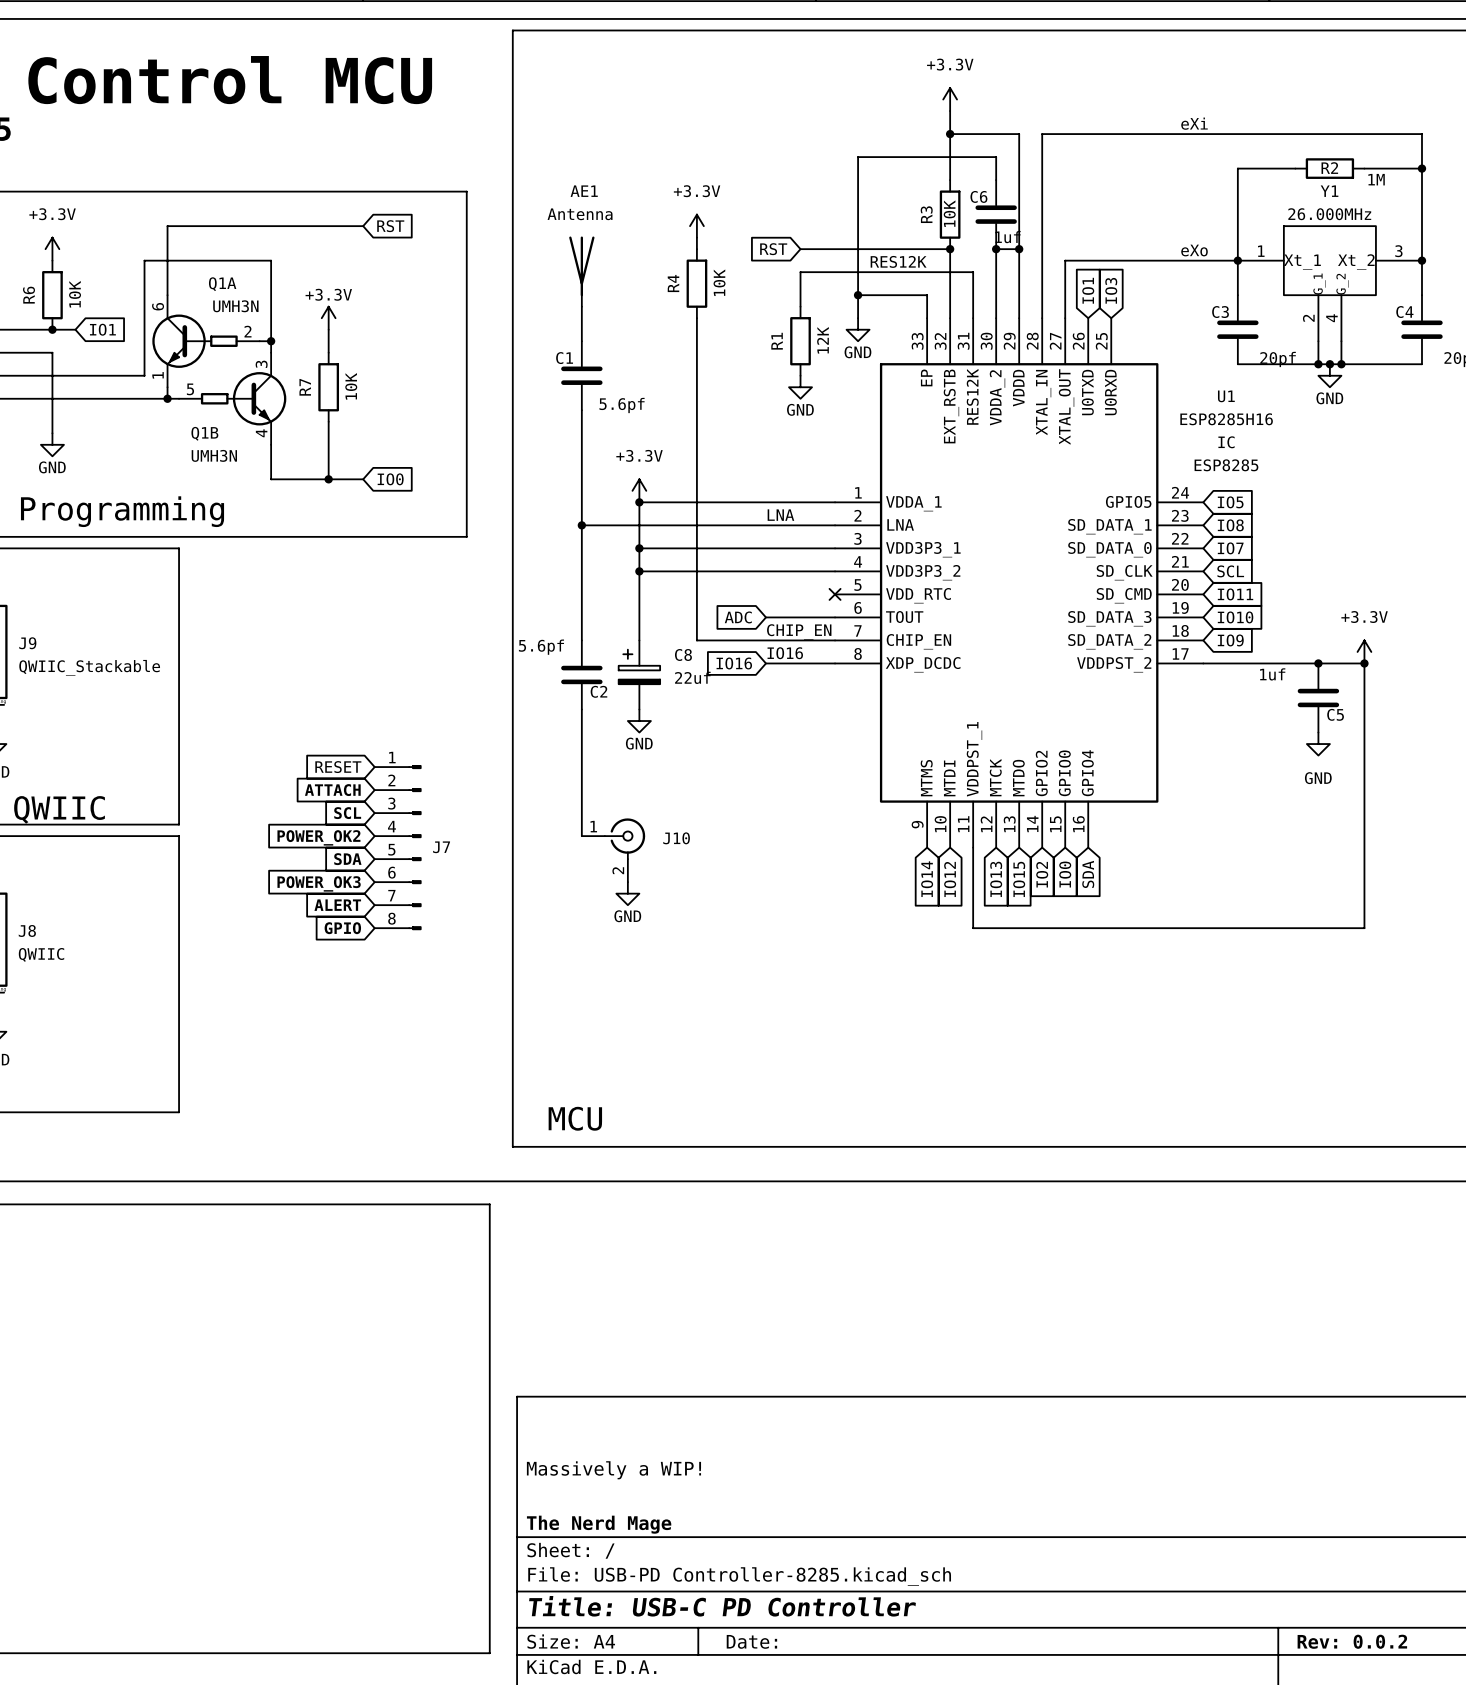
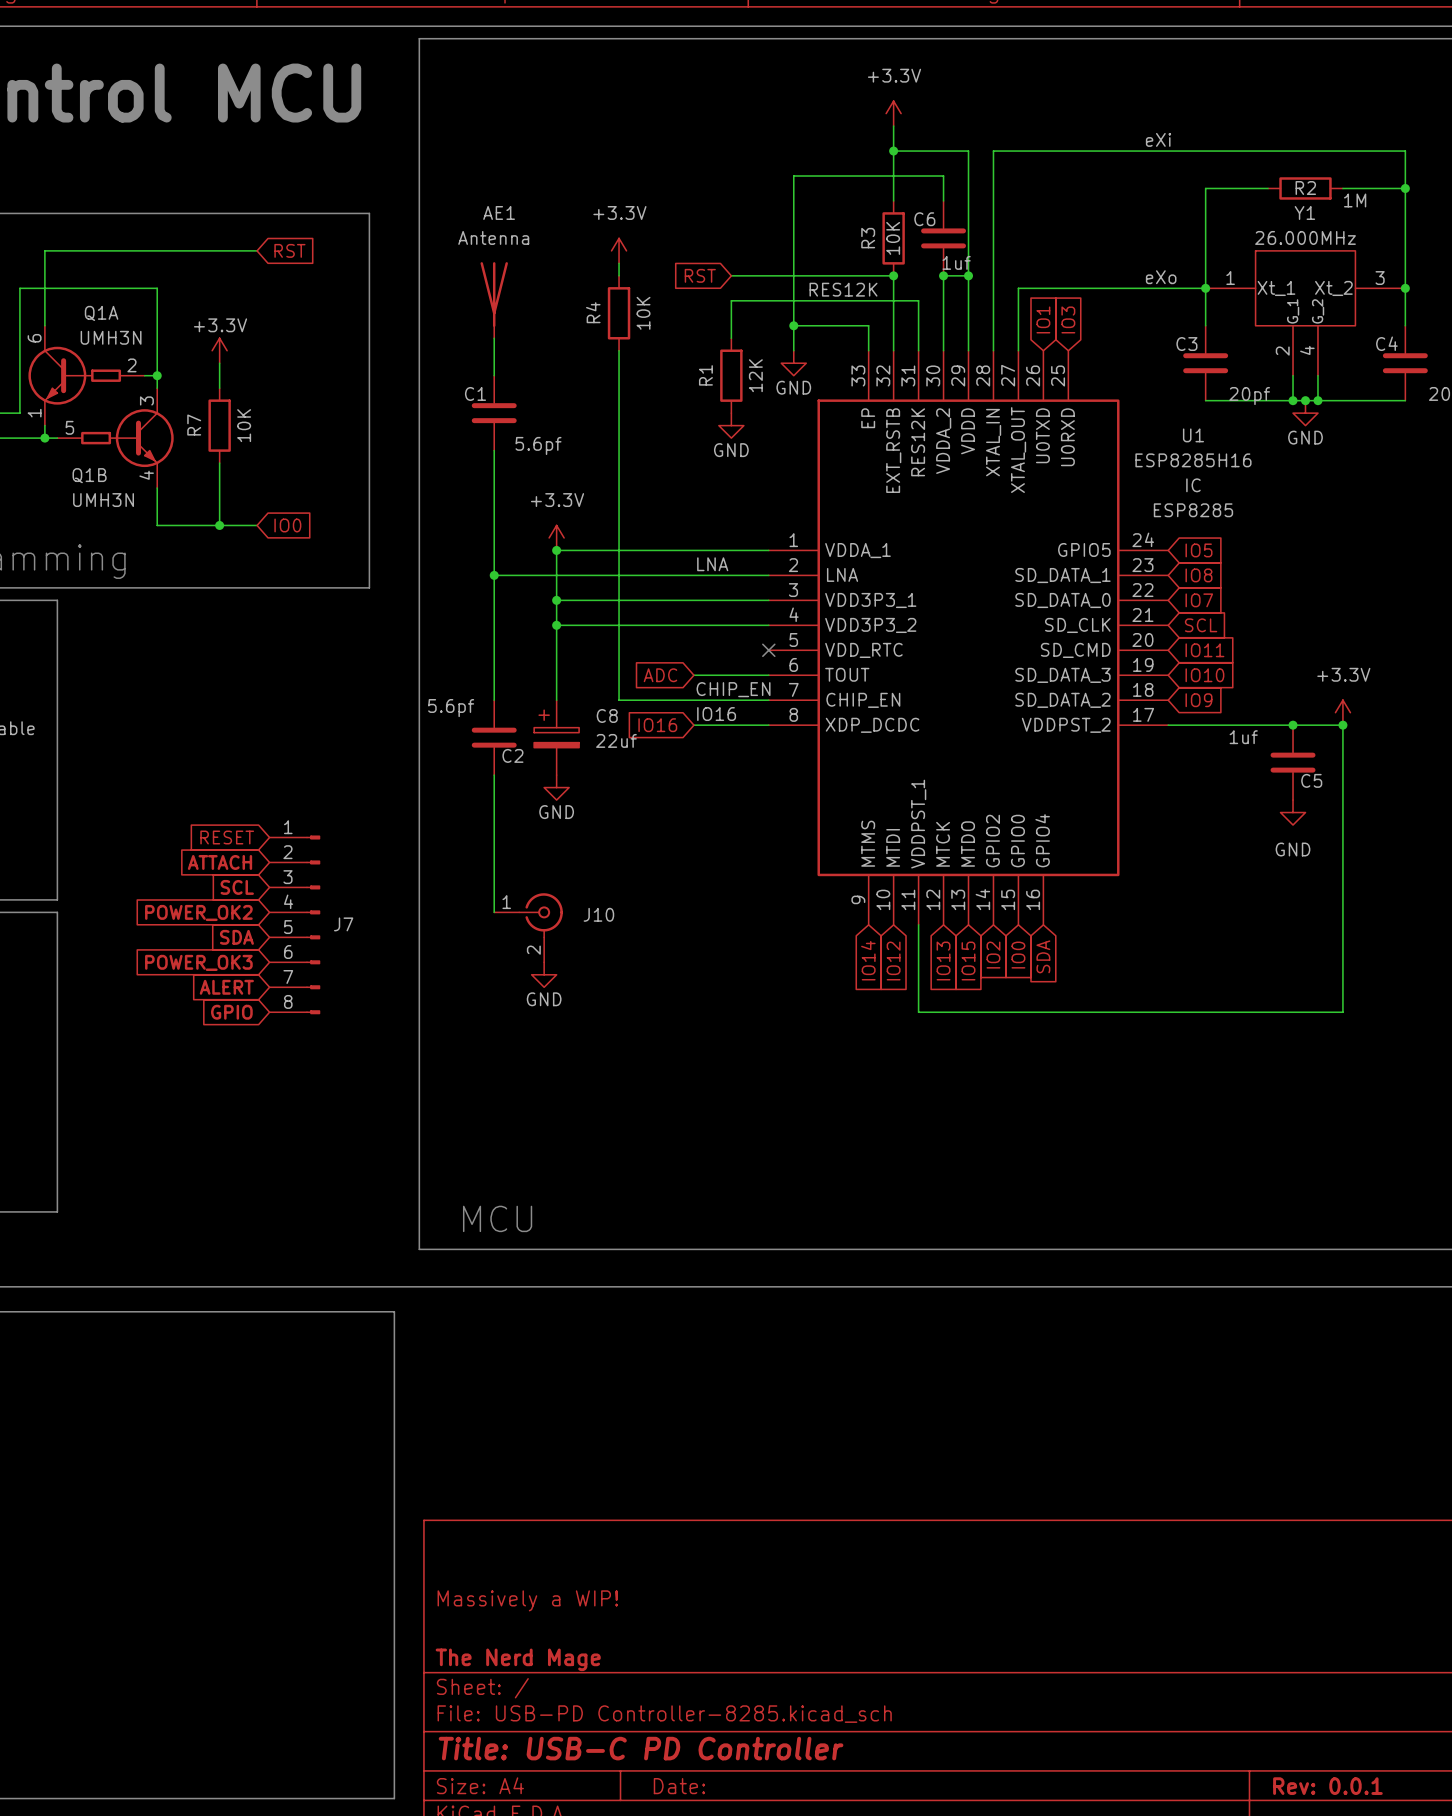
title block: Rev: 0.0.2 (1352, 1641) -> Rev: 0.0.1 (1327, 1786)

